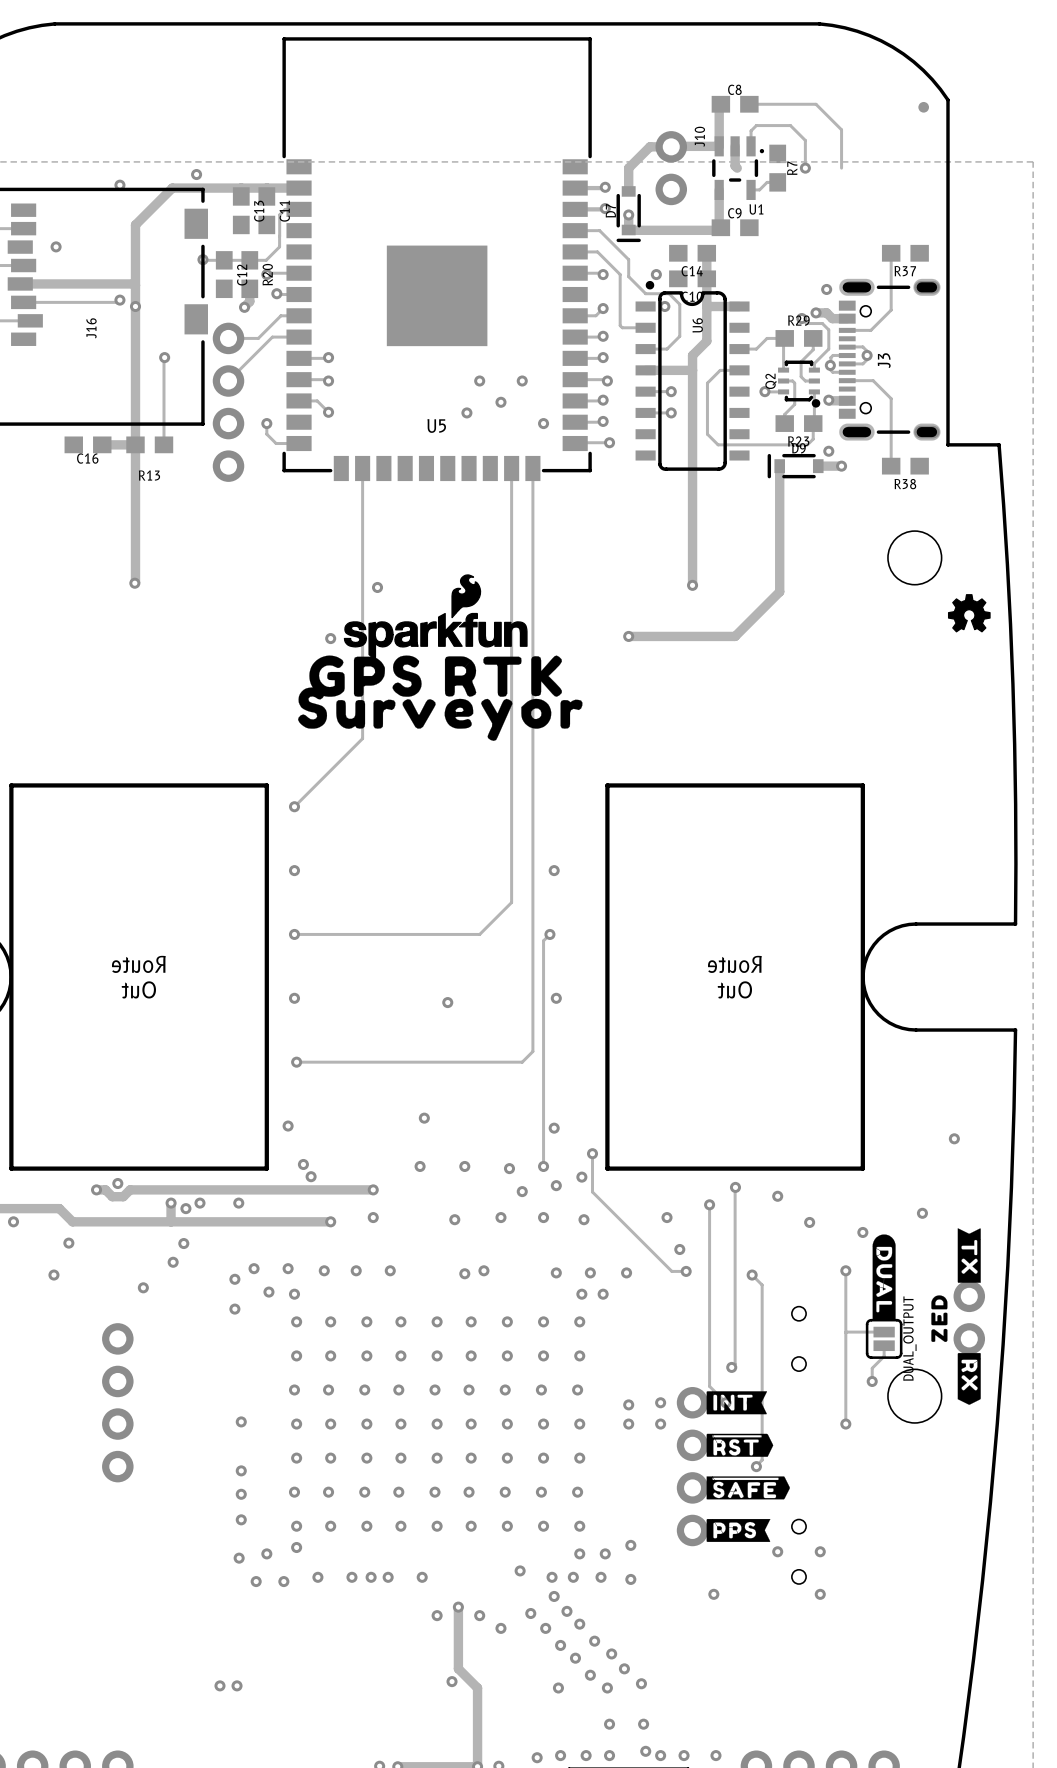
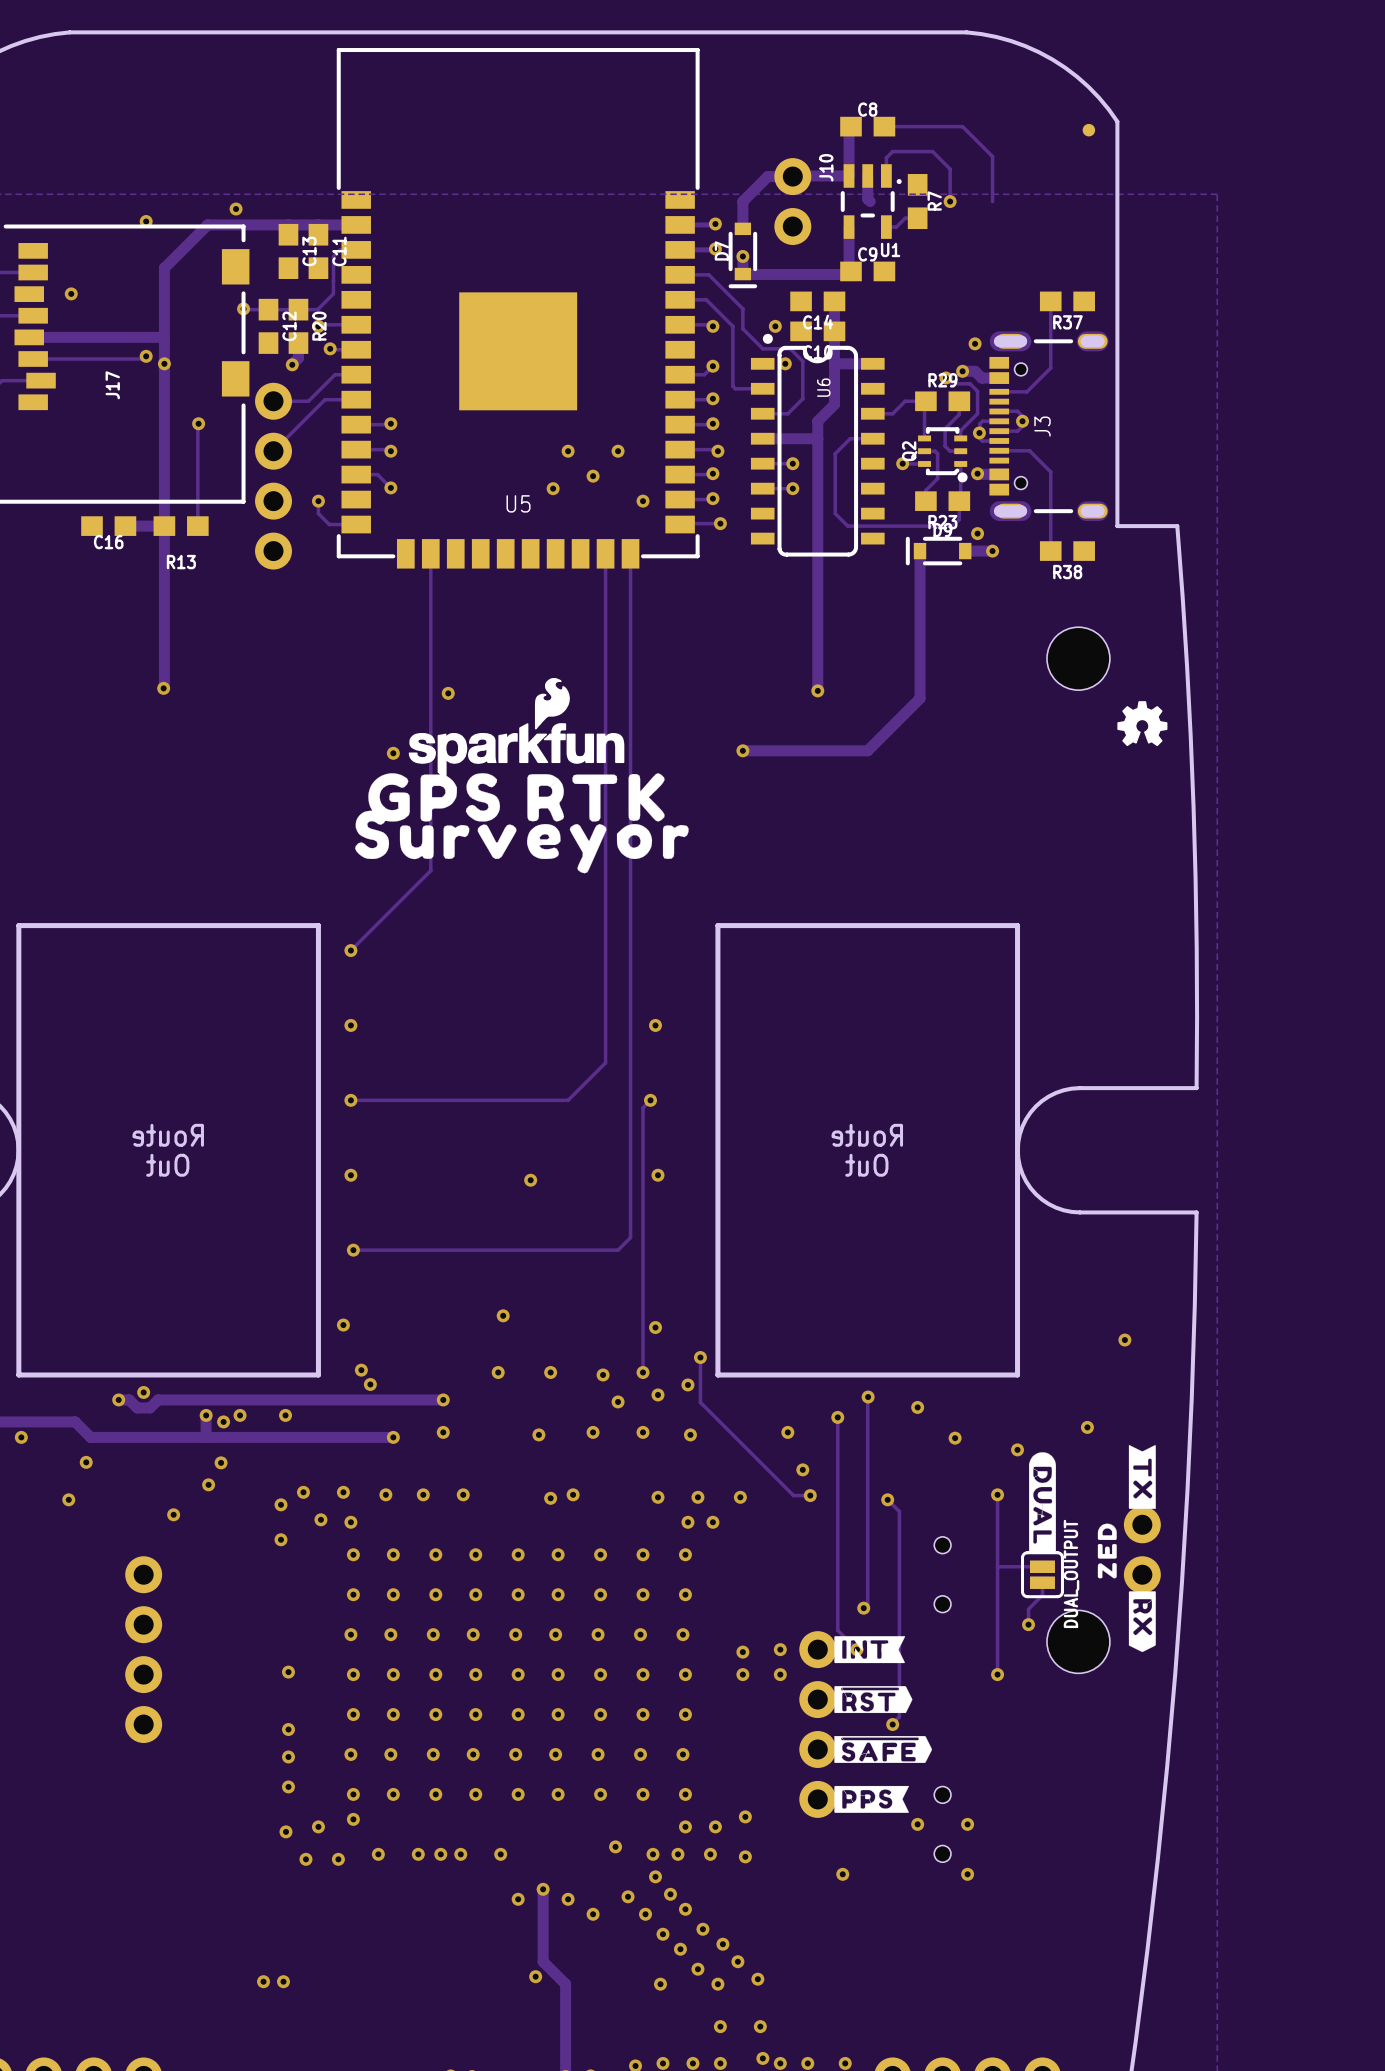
J16 name: J16 (91, 328) -> J17 (112, 385)

